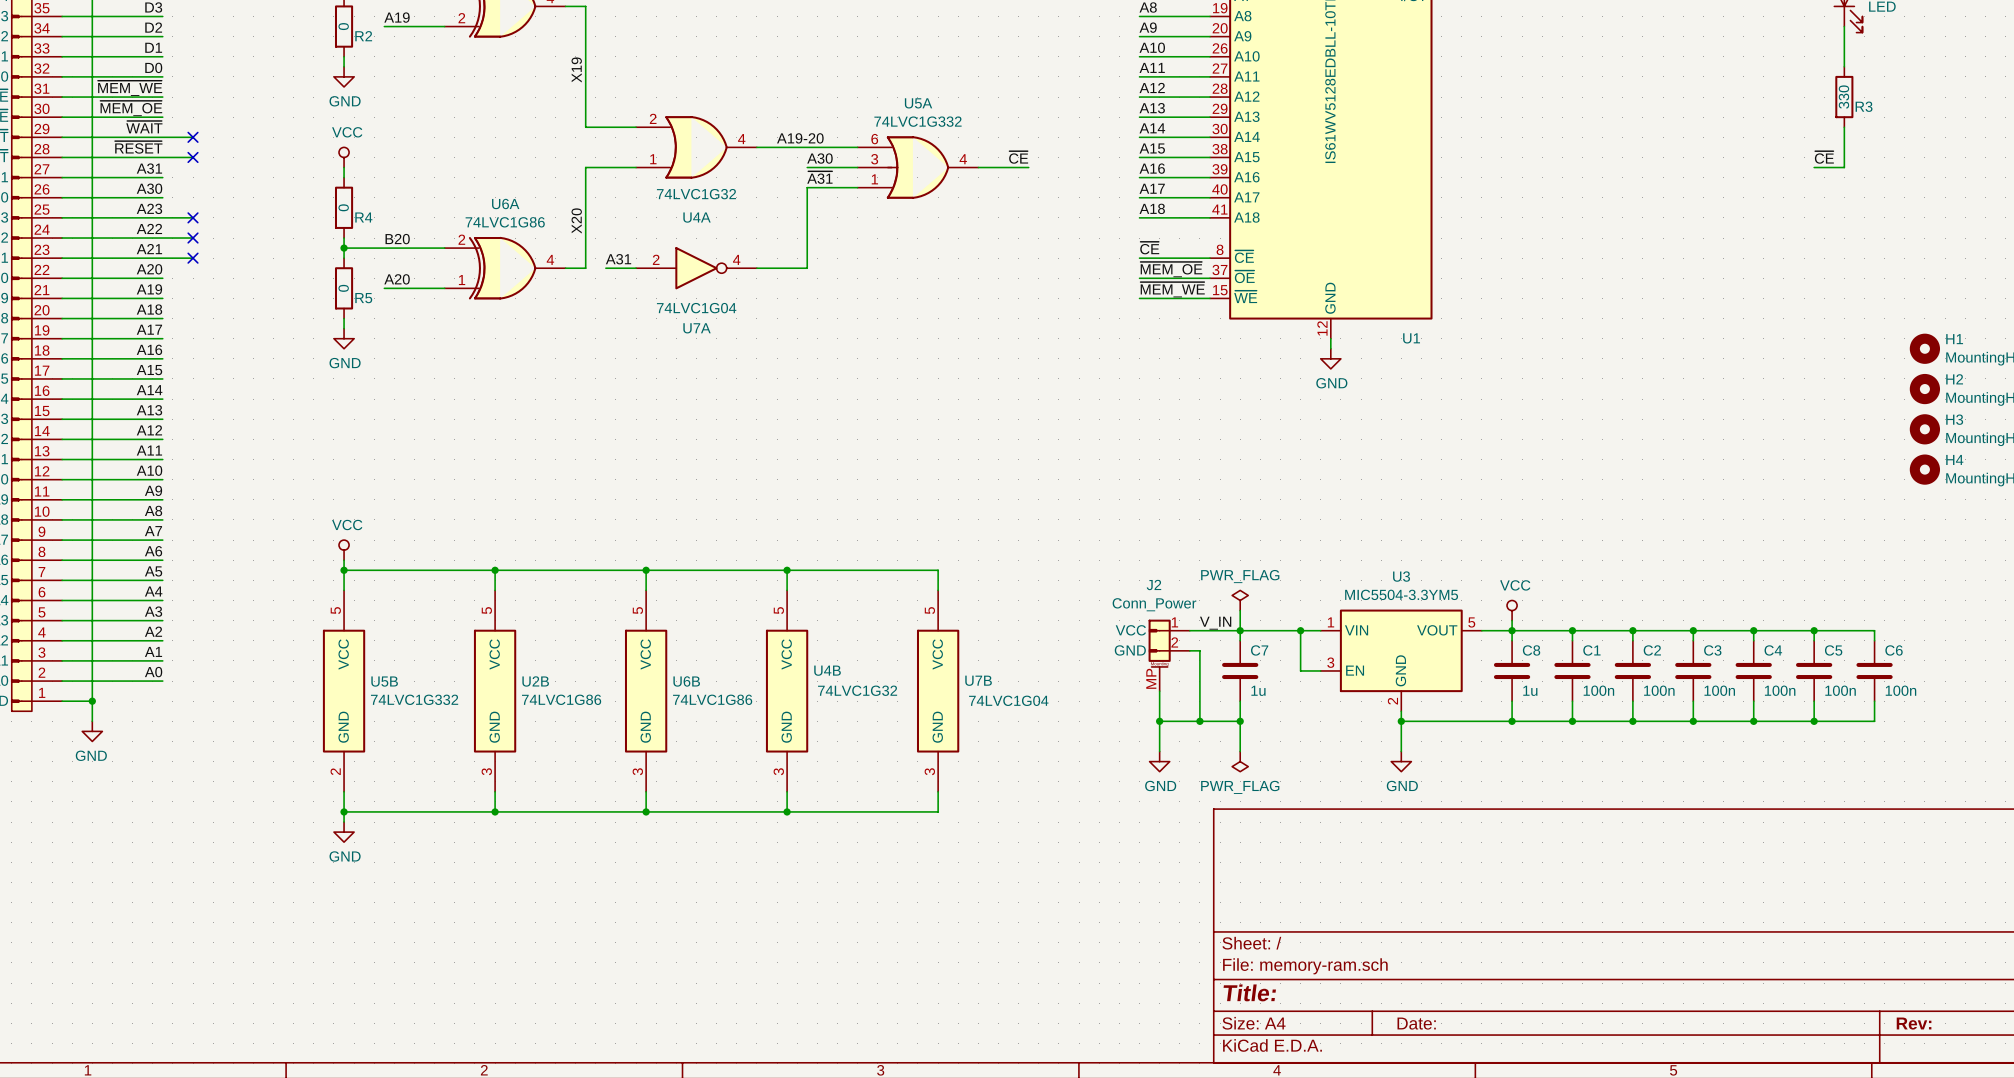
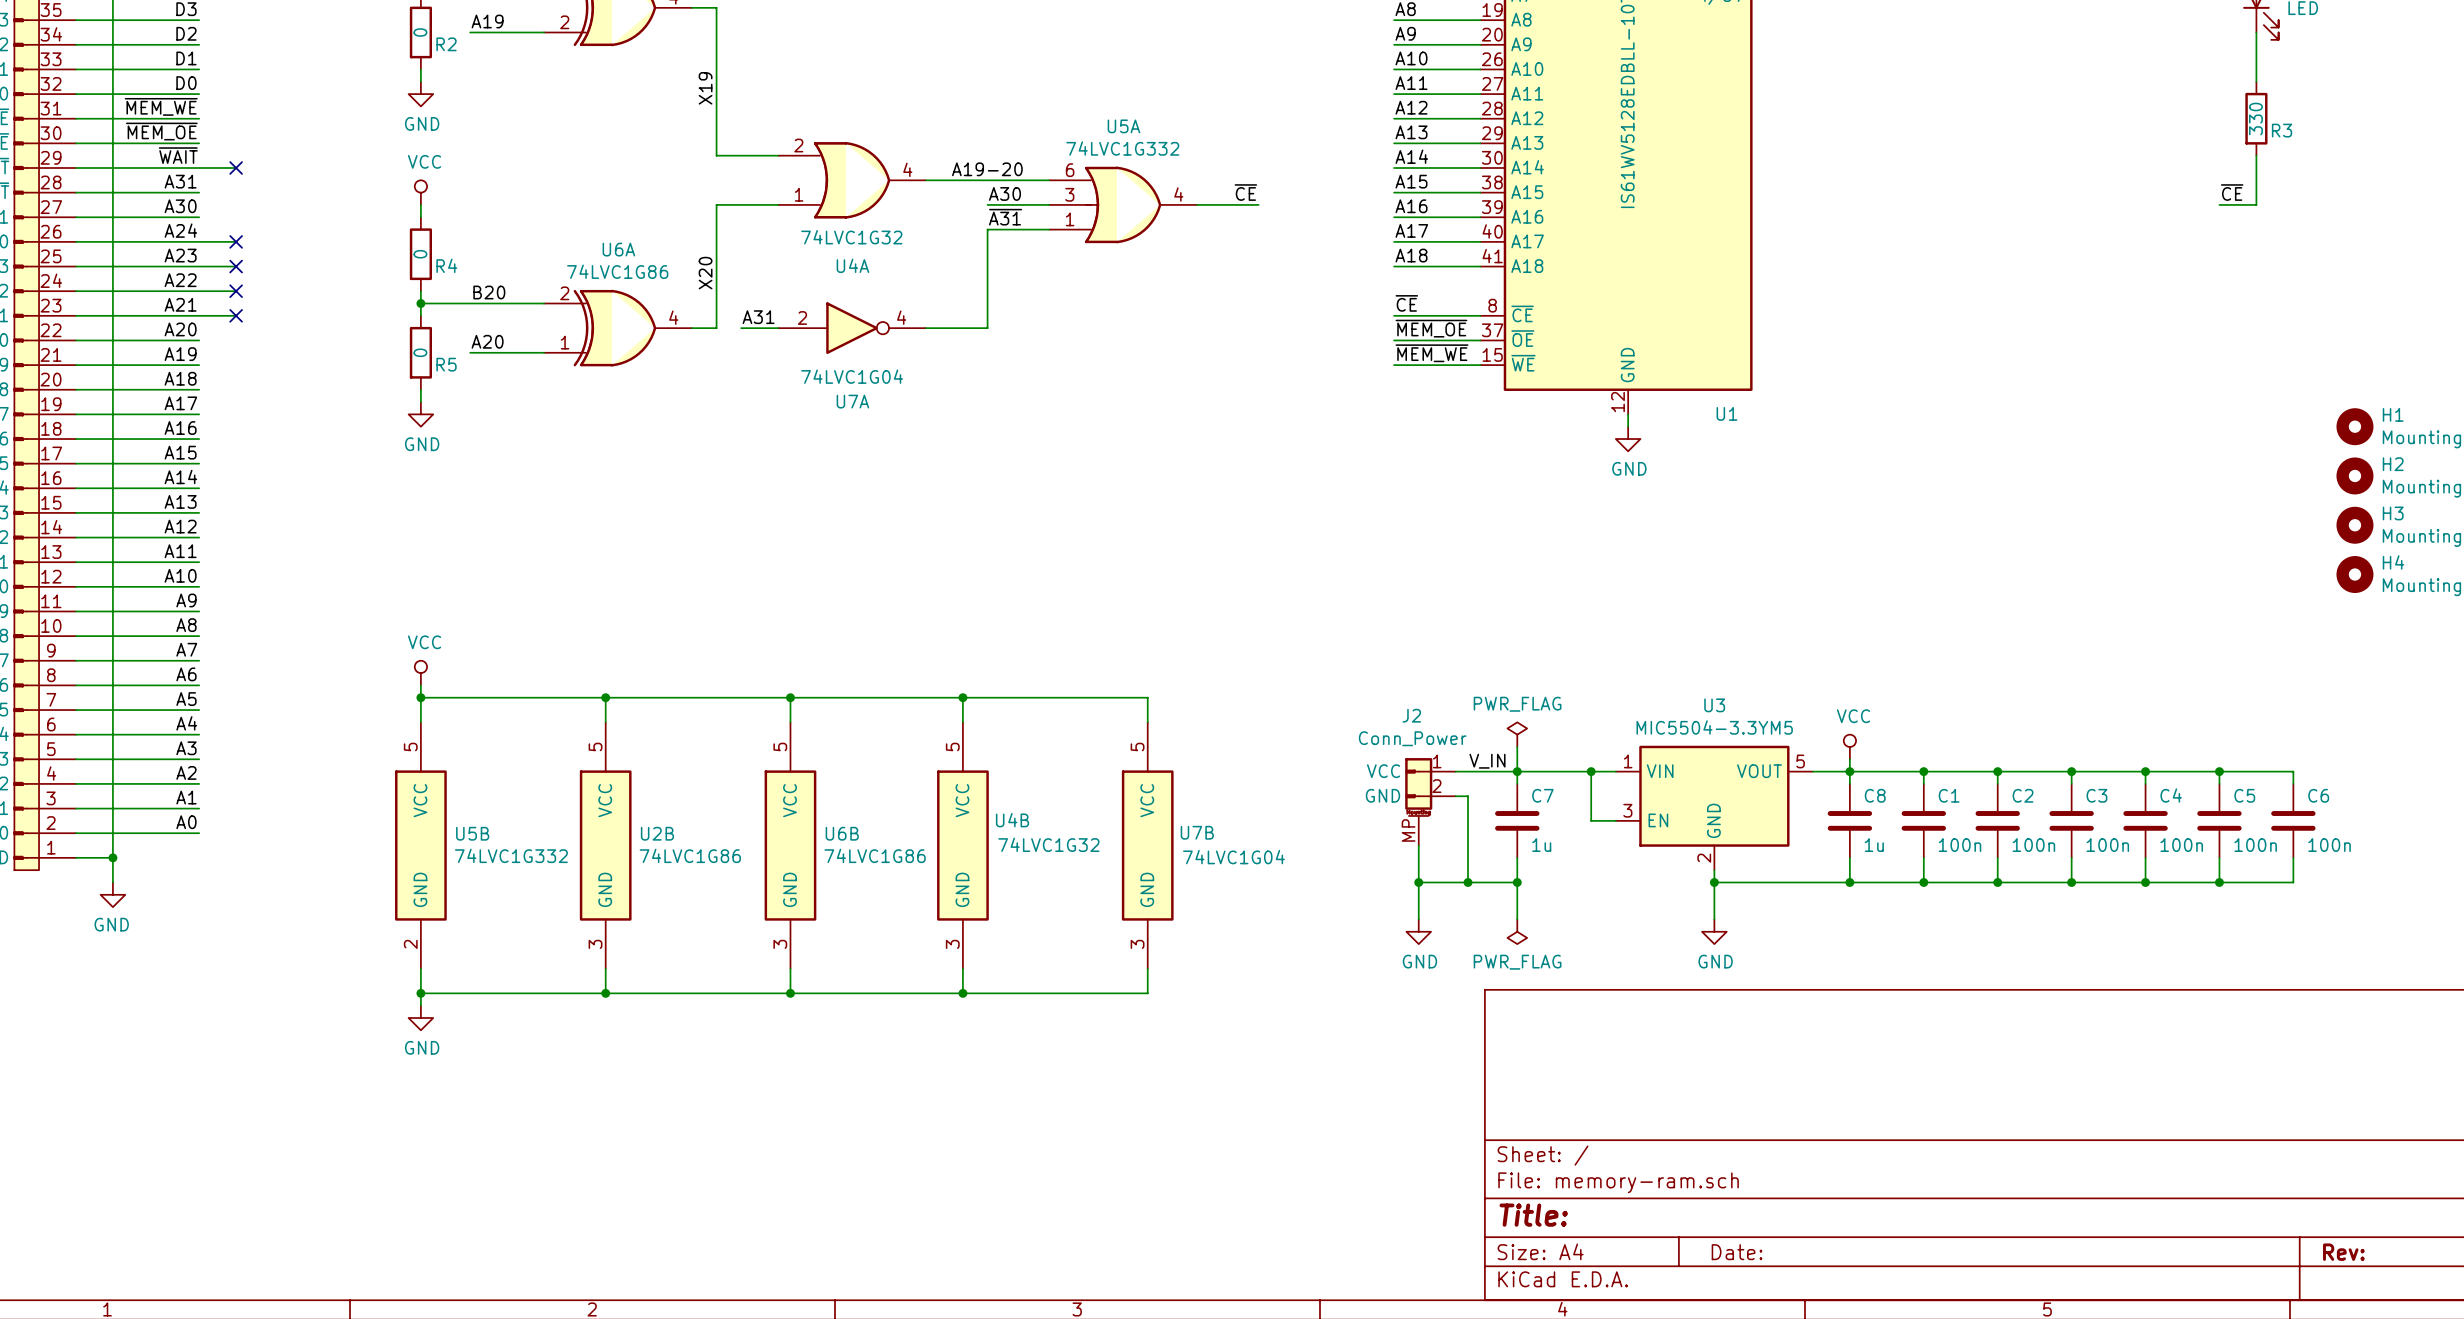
label: ~{RESET} (138, 147) -> A31 (180, 181)
wire: (162, 157) (193, 157) -> (199, 241) (236, 241)
no-connect mark position: (193, 157) -> (236, 241)
label: A31 (149, 168) -> A30 (180, 206)
label: A30 (149, 188) -> A24 (180, 230)

